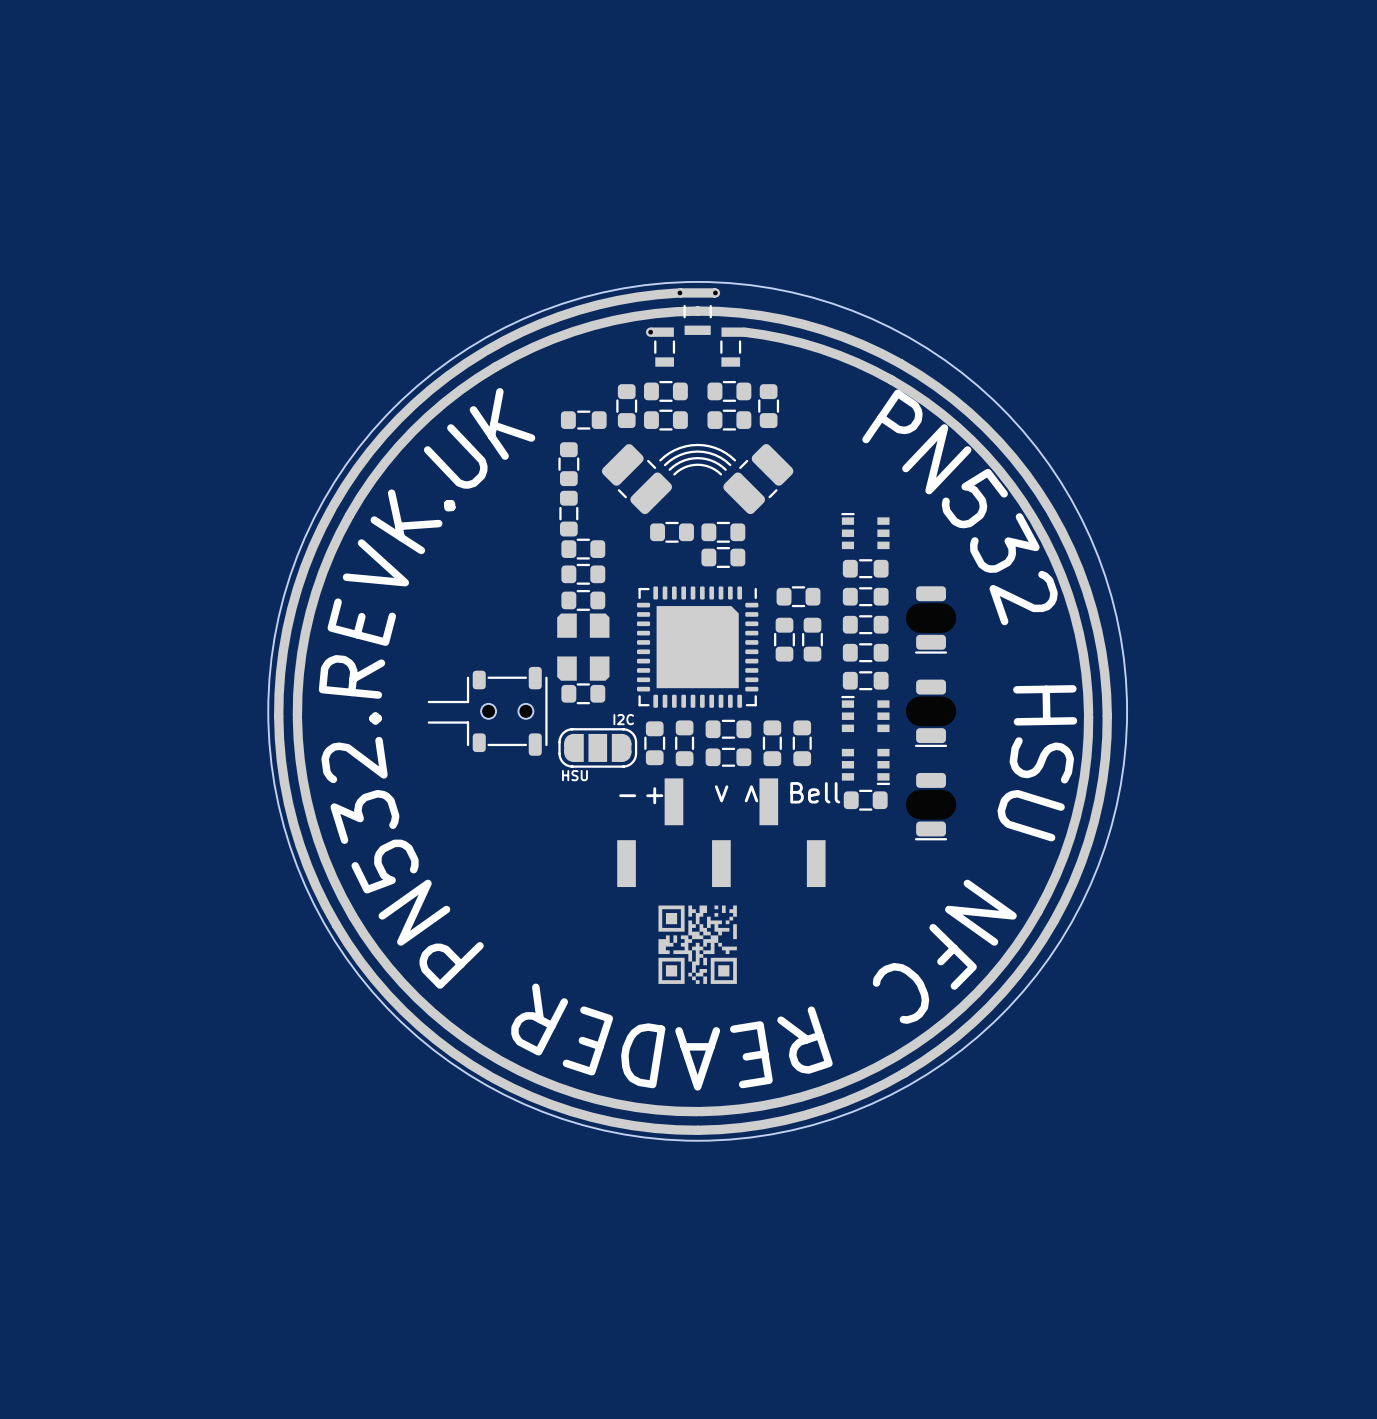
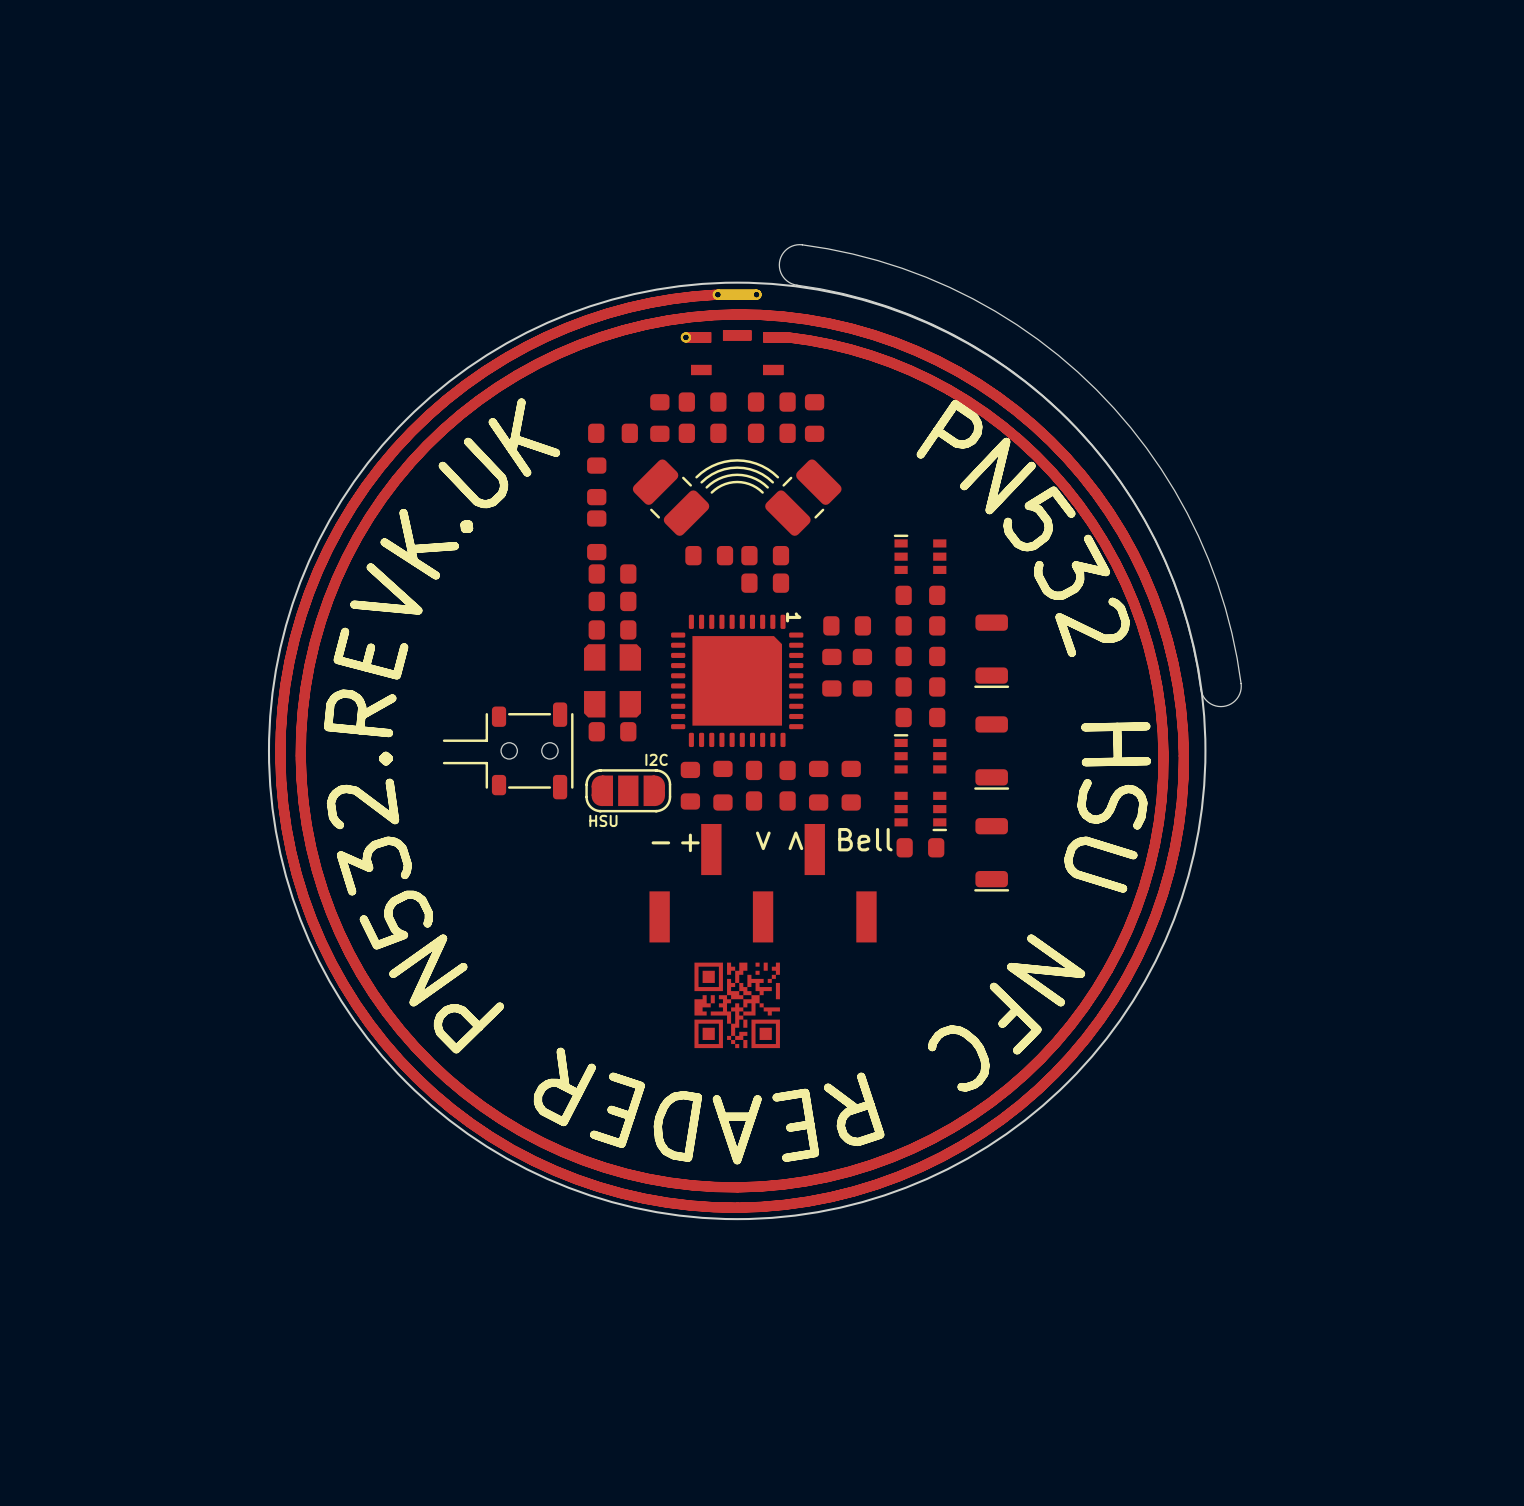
board edge: none -> (802, 244) (852, 254) (902, 268) (972, 298) (1037, 339) (1077, 371) (1114, 408) (1161, 468) (1187, 513) (1208, 559) (1225, 608) (1237, 658) (1241, 686) (1239, 693) (1235, 700) (1226, 705) (1218, 706) (1210, 703) (1203, 696) (1186, 619) (1161, 553) (1127, 491) (1083, 435) (1050, 402) (1013, 372) (953, 334) (888, 306) (843, 293) (794, 284) (787, 281) (780, 270) (780, 257) (789, 247) (802, 244)
drawing: [683, 304, 712, 319] -> none
drawing: [654, 340, 676, 354] -> none
drawing: [720, 340, 742, 354] -> none
part footprint: [644, 380, 688, 402] -> [678, 392, 727, 412]
part footprint: [707, 380, 752, 402] -> [747, 392, 796, 412]
part footprint: [616, 384, 638, 429] -> [650, 394, 670, 442]
part footprint: [758, 384, 780, 429] -> [804, 394, 825, 442]
part footprint: [644, 409, 688, 431] -> [678, 423, 727, 443]
part footprint: [707, 409, 752, 431] -> [747, 423, 796, 443]
part footprint: [560, 410, 607, 430] -> [588, 423, 638, 443]
part footprint: [558, 442, 580, 487] -> [587, 457, 607, 506]
part footprint: [559, 490, 579, 537] -> [587, 510, 607, 561]
part footprint: [650, 521, 694, 543] -> [685, 545, 734, 566]
part footprint: [701, 521, 746, 543] -> [741, 545, 790, 566]
part footprint: [561, 538, 606, 560] -> [588, 564, 637, 584]
part footprint: [701, 547, 746, 568] -> [741, 573, 790, 593]
part footprint: [842, 559, 889, 579] -> [895, 585, 946, 606]
part footprint: [561, 563, 606, 585] -> [588, 591, 637, 612]
part footprint: [637, 586, 759, 708] -> [671, 614, 804, 748]
part footprint: [776, 586, 821, 608] -> [823, 616, 872, 636]
part footprint: [842, 587, 889, 607] -> [895, 616, 946, 636]
part footprint: [561, 589, 606, 611] -> [588, 620, 637, 640]
part footprint: [842, 615, 889, 635] -> [895, 646, 946, 667]
part footprint: [774, 617, 795, 662] -> [822, 648, 842, 697]
part footprint: [802, 617, 823, 662] -> [852, 648, 873, 697]
part footprint: [842, 643, 889, 663] -> [895, 677, 946, 697]
part footprint: [842, 671, 889, 691] -> [895, 707, 946, 728]
part footprint: [561, 683, 606, 705] -> [588, 722, 637, 742]
part: none -> (732, 751)
part footprint: [705, 719, 752, 739] -> [745, 760, 796, 781]
part footprint: [675, 720, 695, 767] -> [713, 760, 733, 811]
part footprint: [762, 720, 782, 767] -> [808, 760, 829, 811]
part footprint: [792, 720, 812, 767] -> [841, 760, 861, 811]
part footprint: [644, 721, 666, 766] -> [680, 761, 701, 810]
part footprint: [705, 747, 752, 767] -> [745, 791, 796, 811]
part footprint: [843, 789, 888, 811] -> [896, 838, 945, 858]

